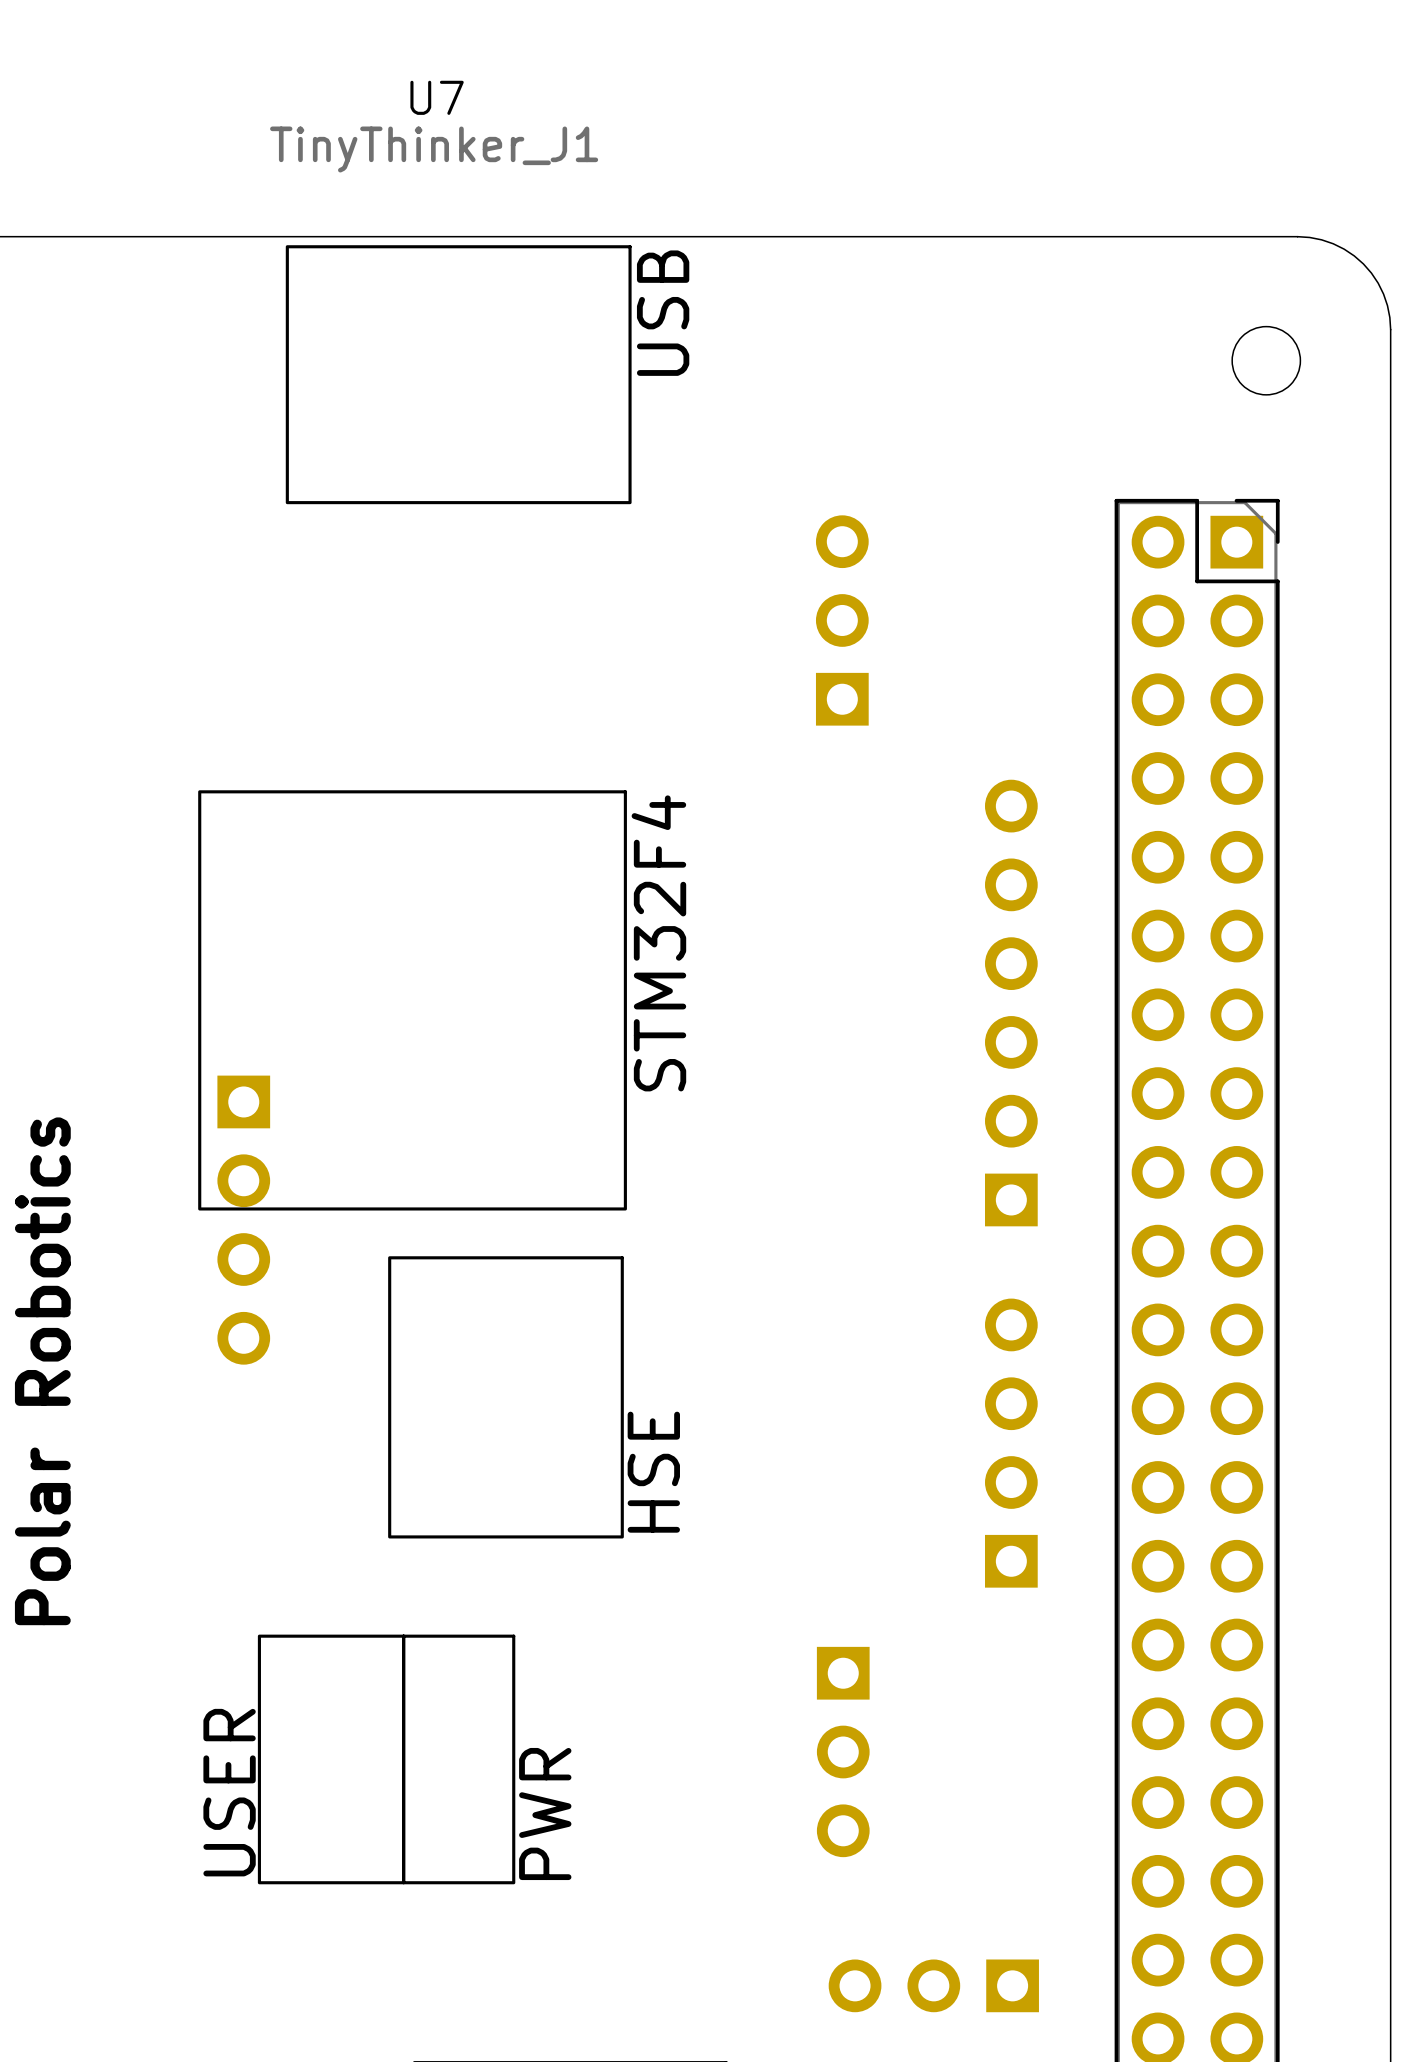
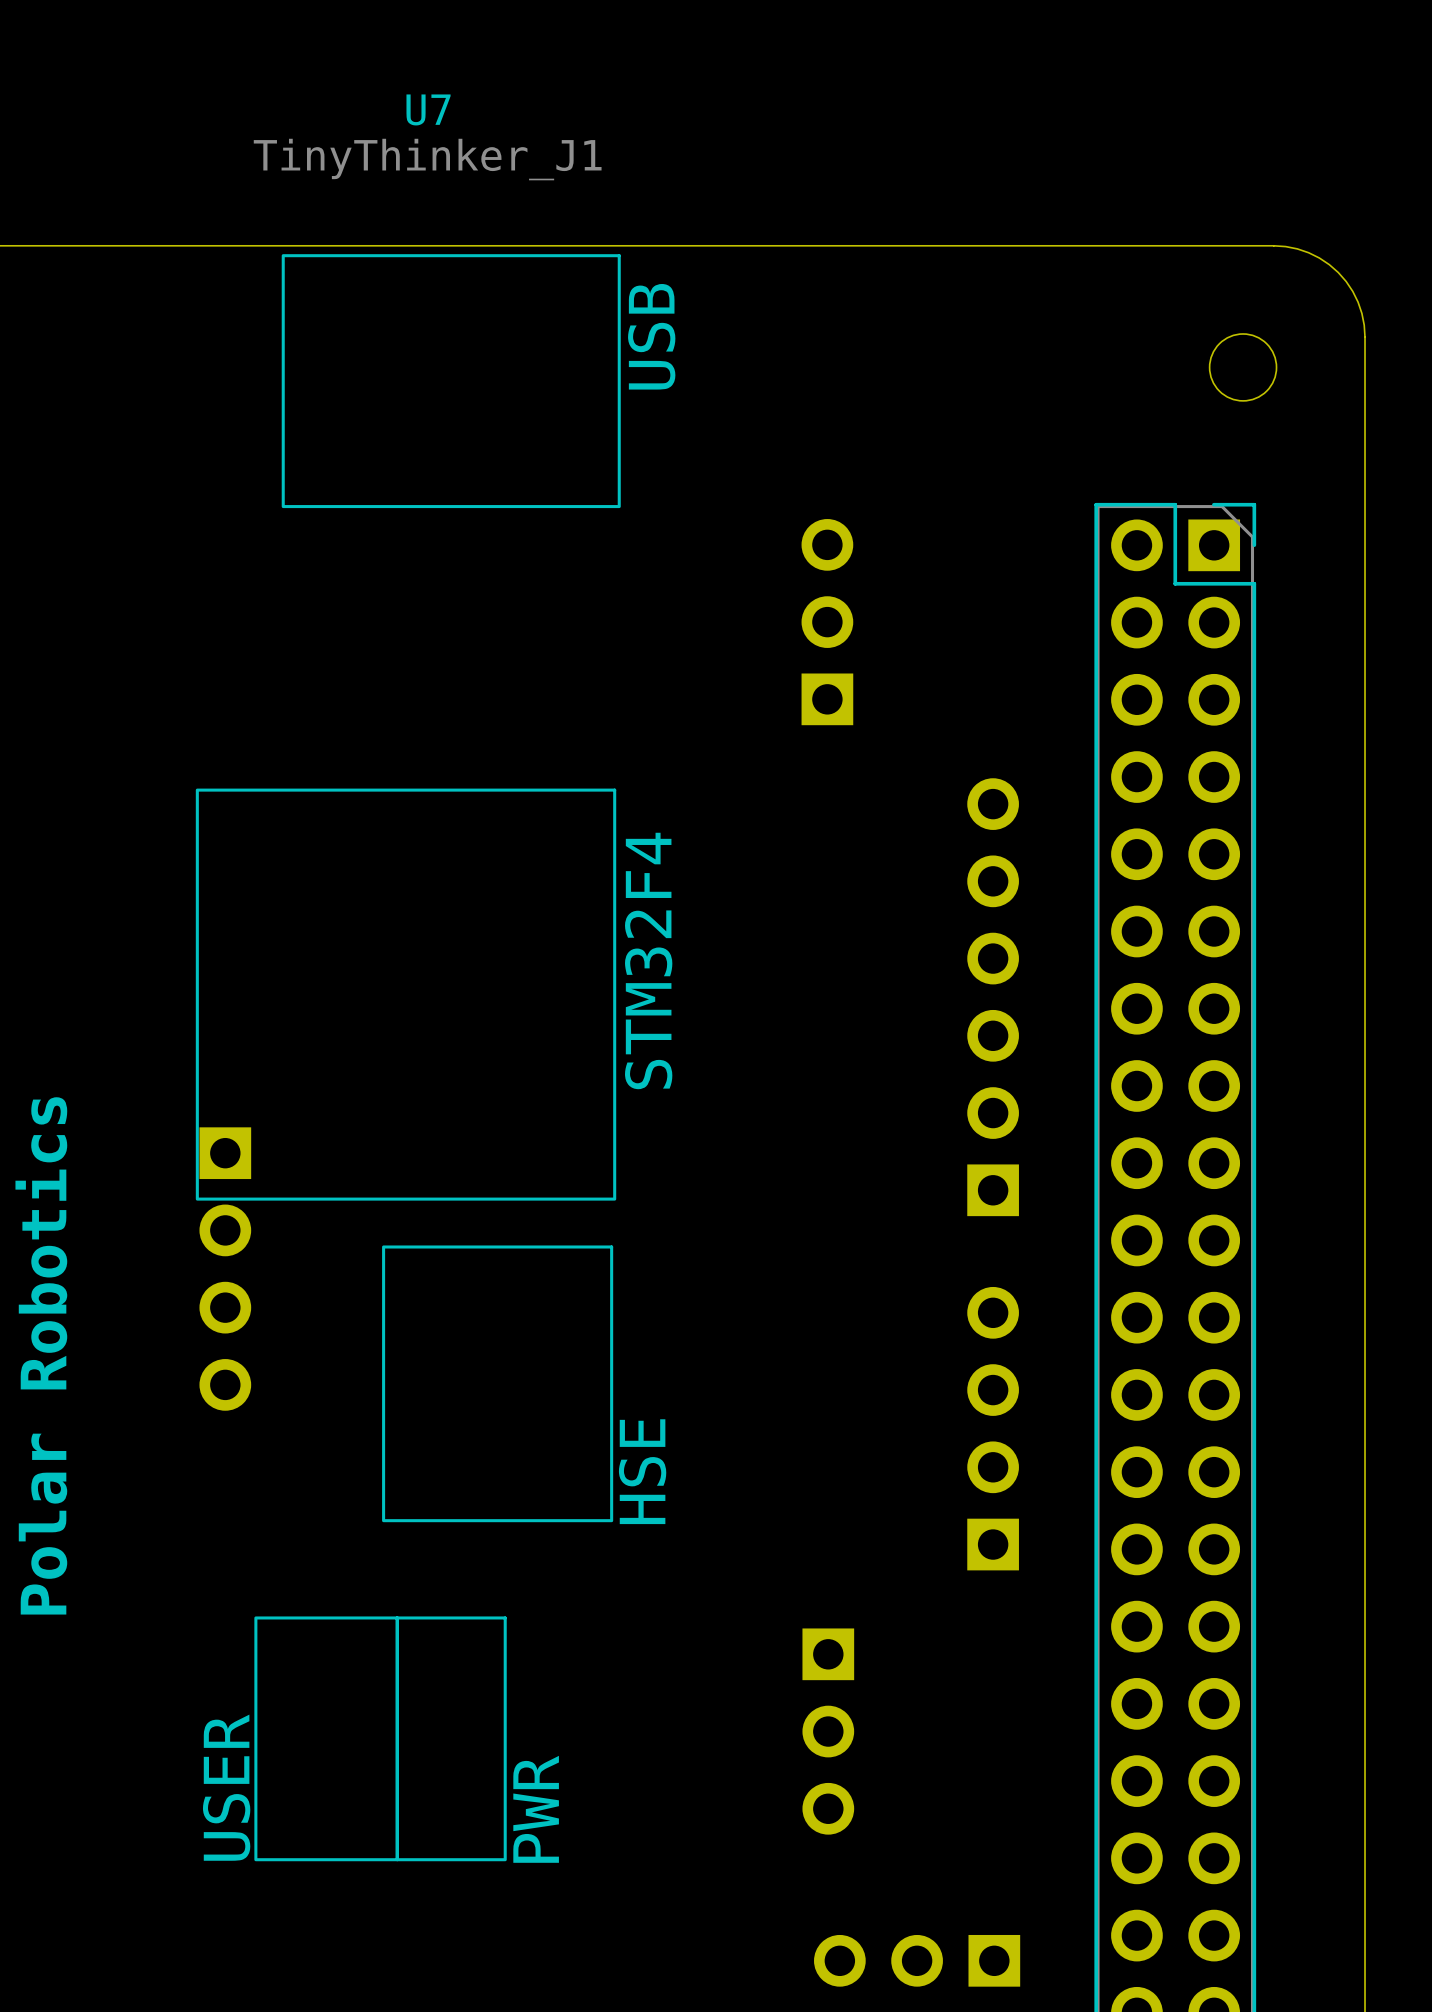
part position: (243, 1220) -> (225, 1269)

